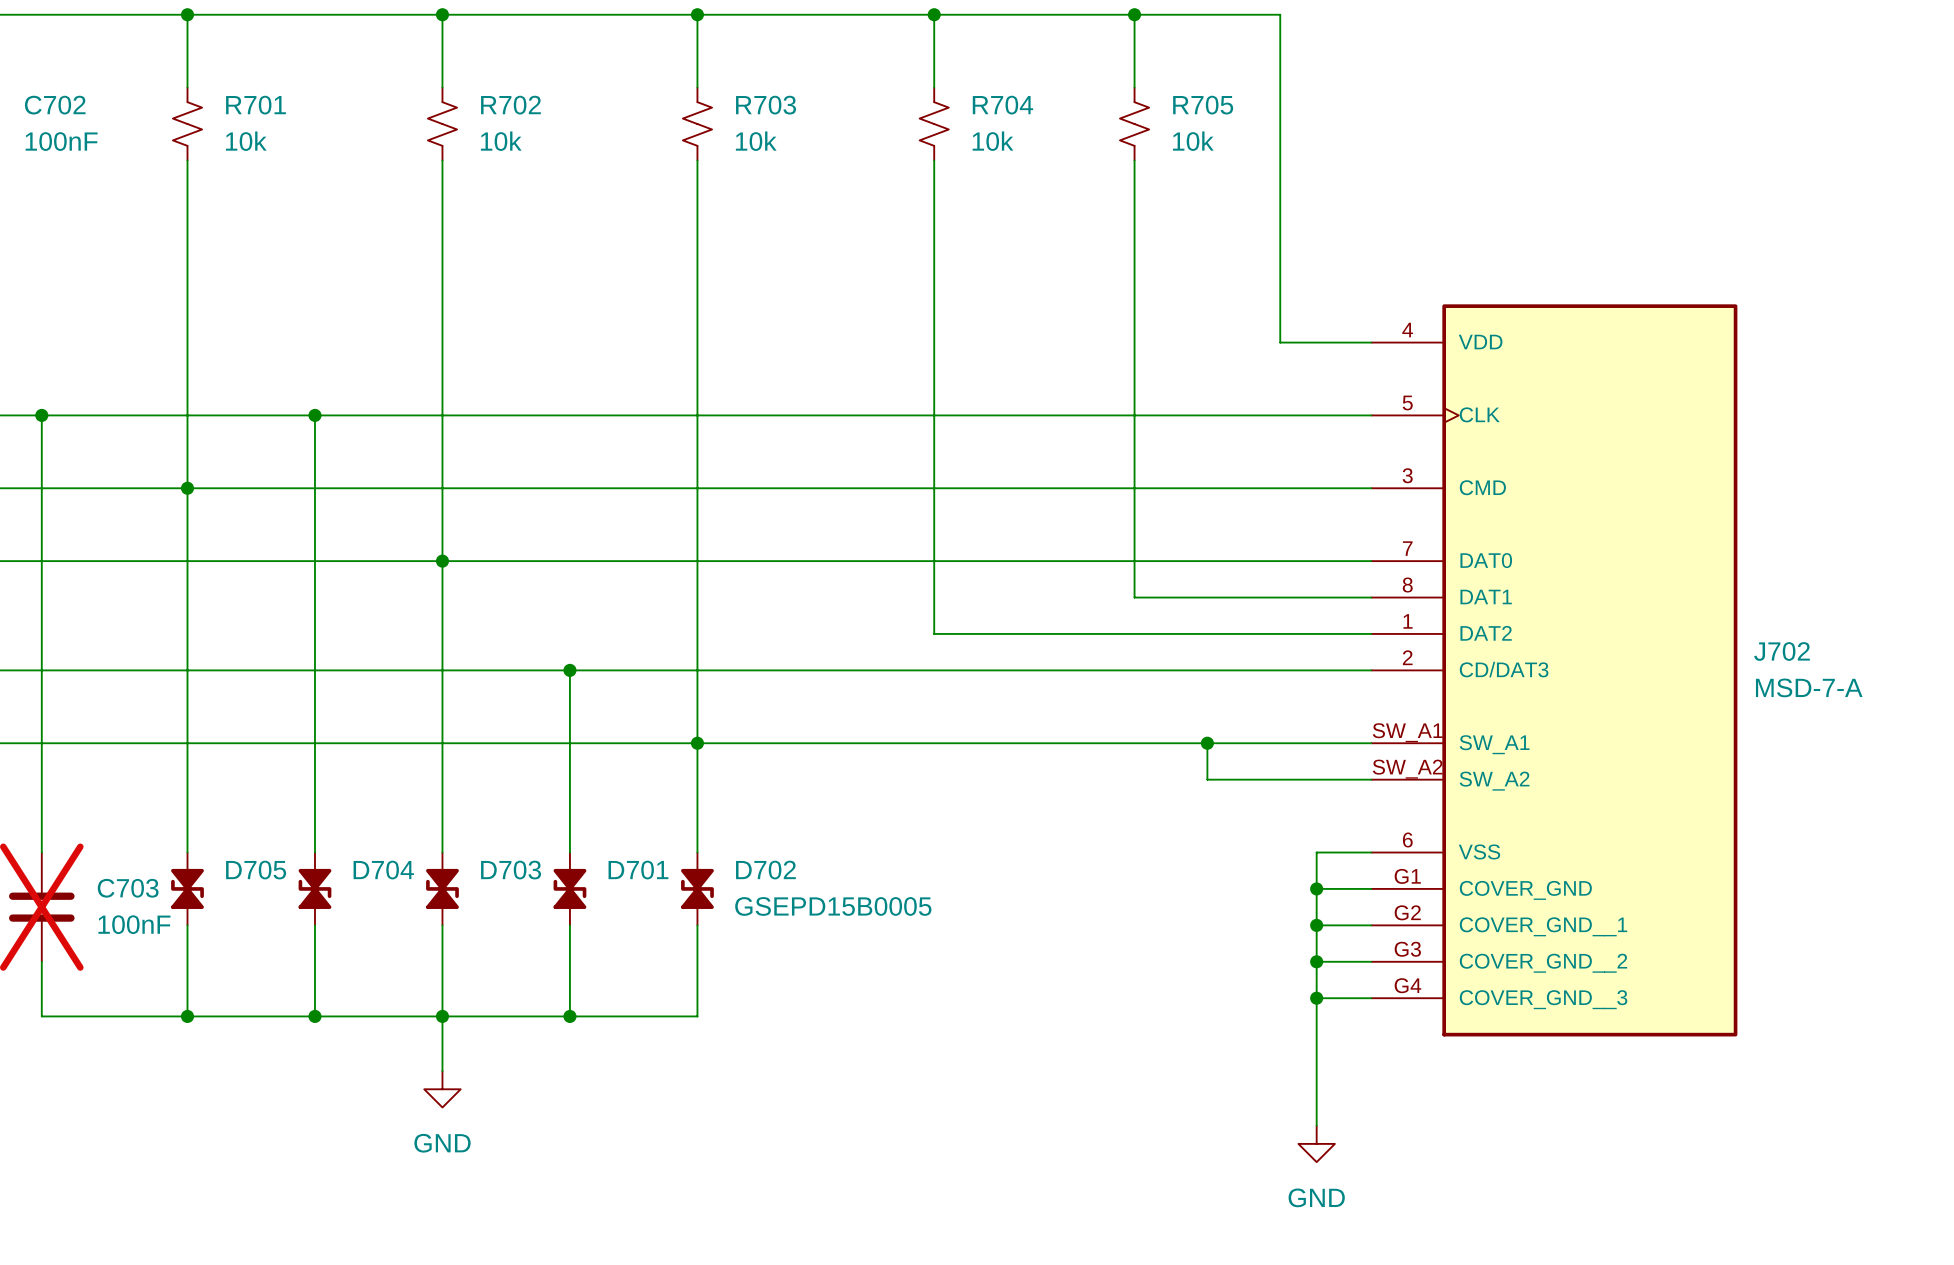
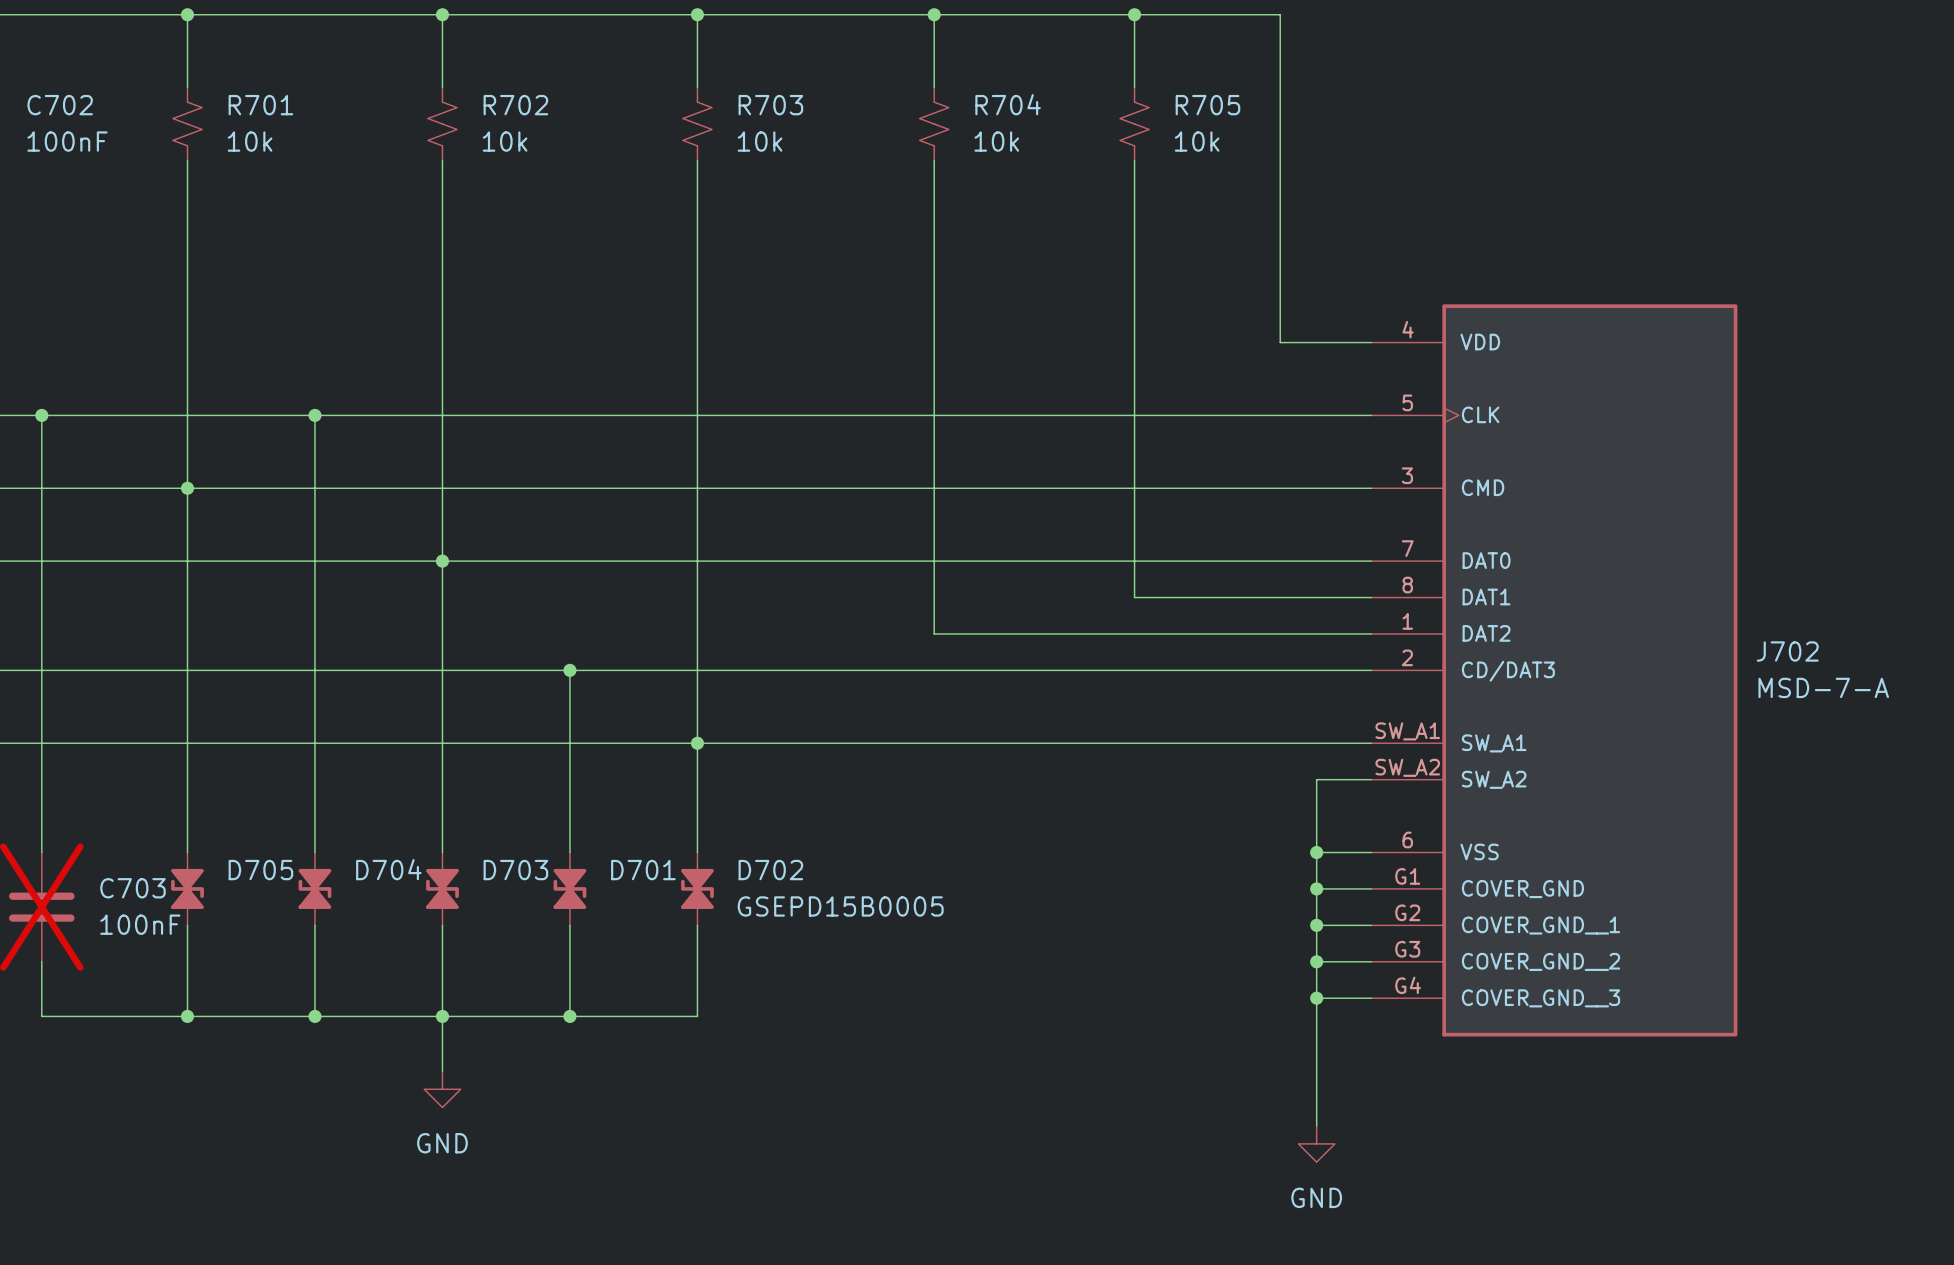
wire: (1207, 743) (1207, 779) (1316, 779) -> (1316, 852) (1316, 779)
junction: (1207, 743) -> none
junction: none -> (1316, 852)

